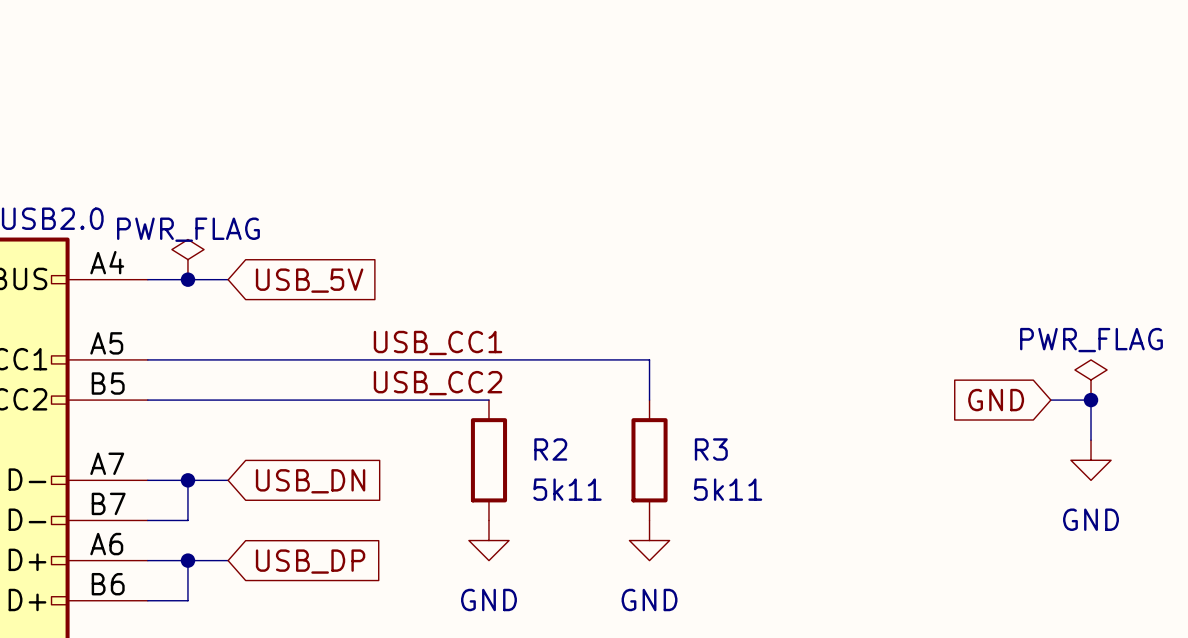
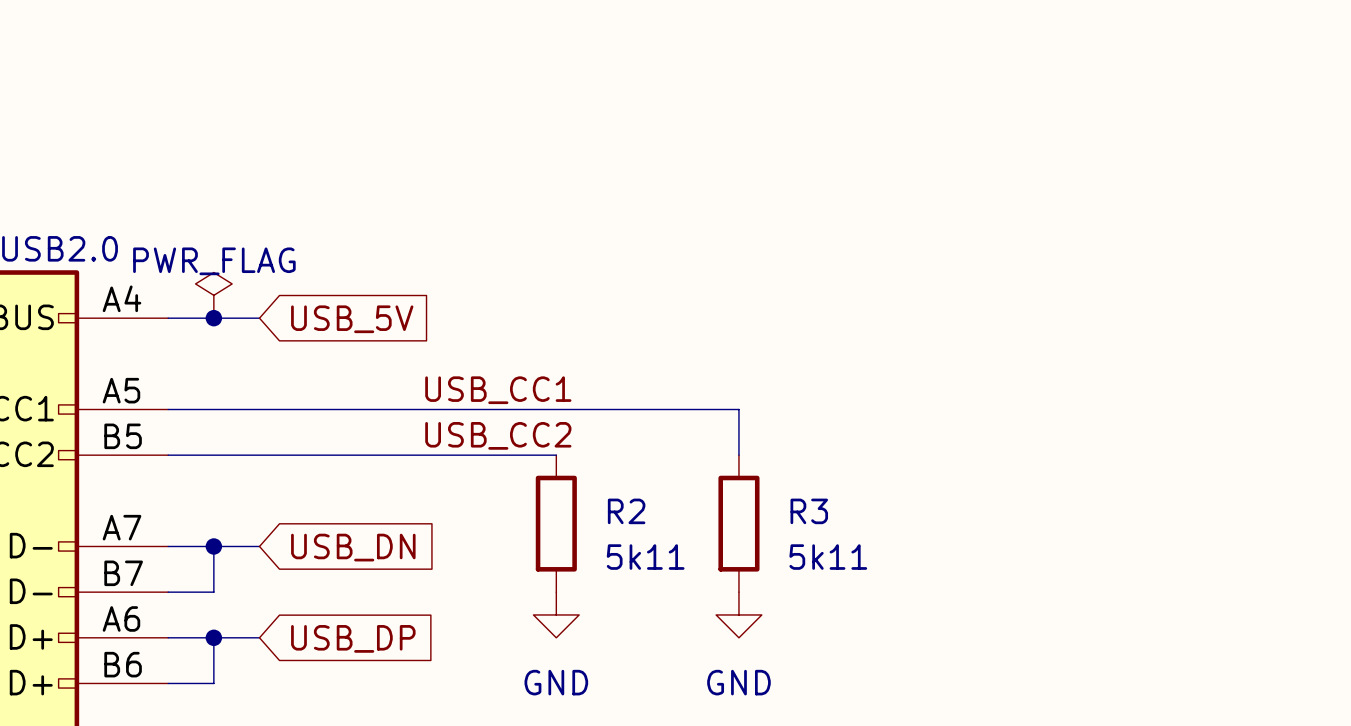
power symbol: PWR_FLAG (1091, 380) -> none
global label: GND (996, 400) -> none
wire: (1050, 400) (1091, 400) (1091, 440) -> none
junction: (1091, 400) -> none
power symbol: GND (1091, 460) -> none

